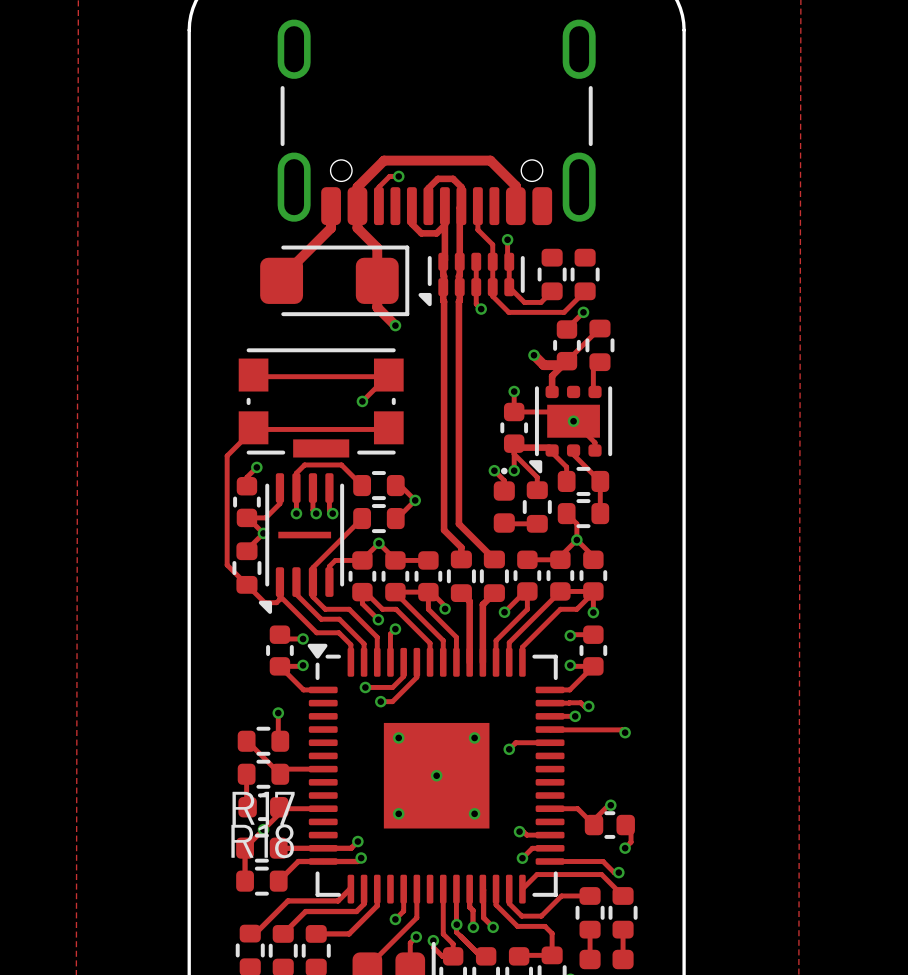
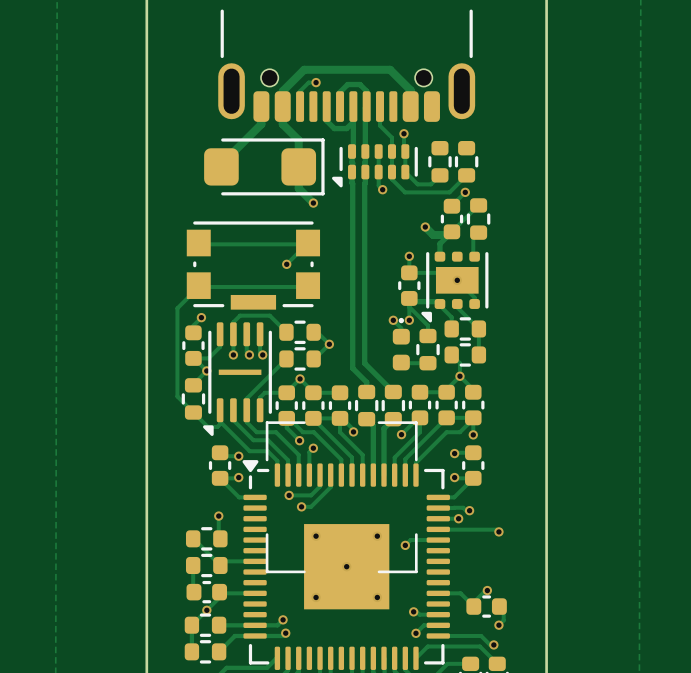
drawing: none -> [265, 421, 418, 574]
R17 name: R17 (263, 808) -> none
R18 name: R18 (262, 841) -> none

